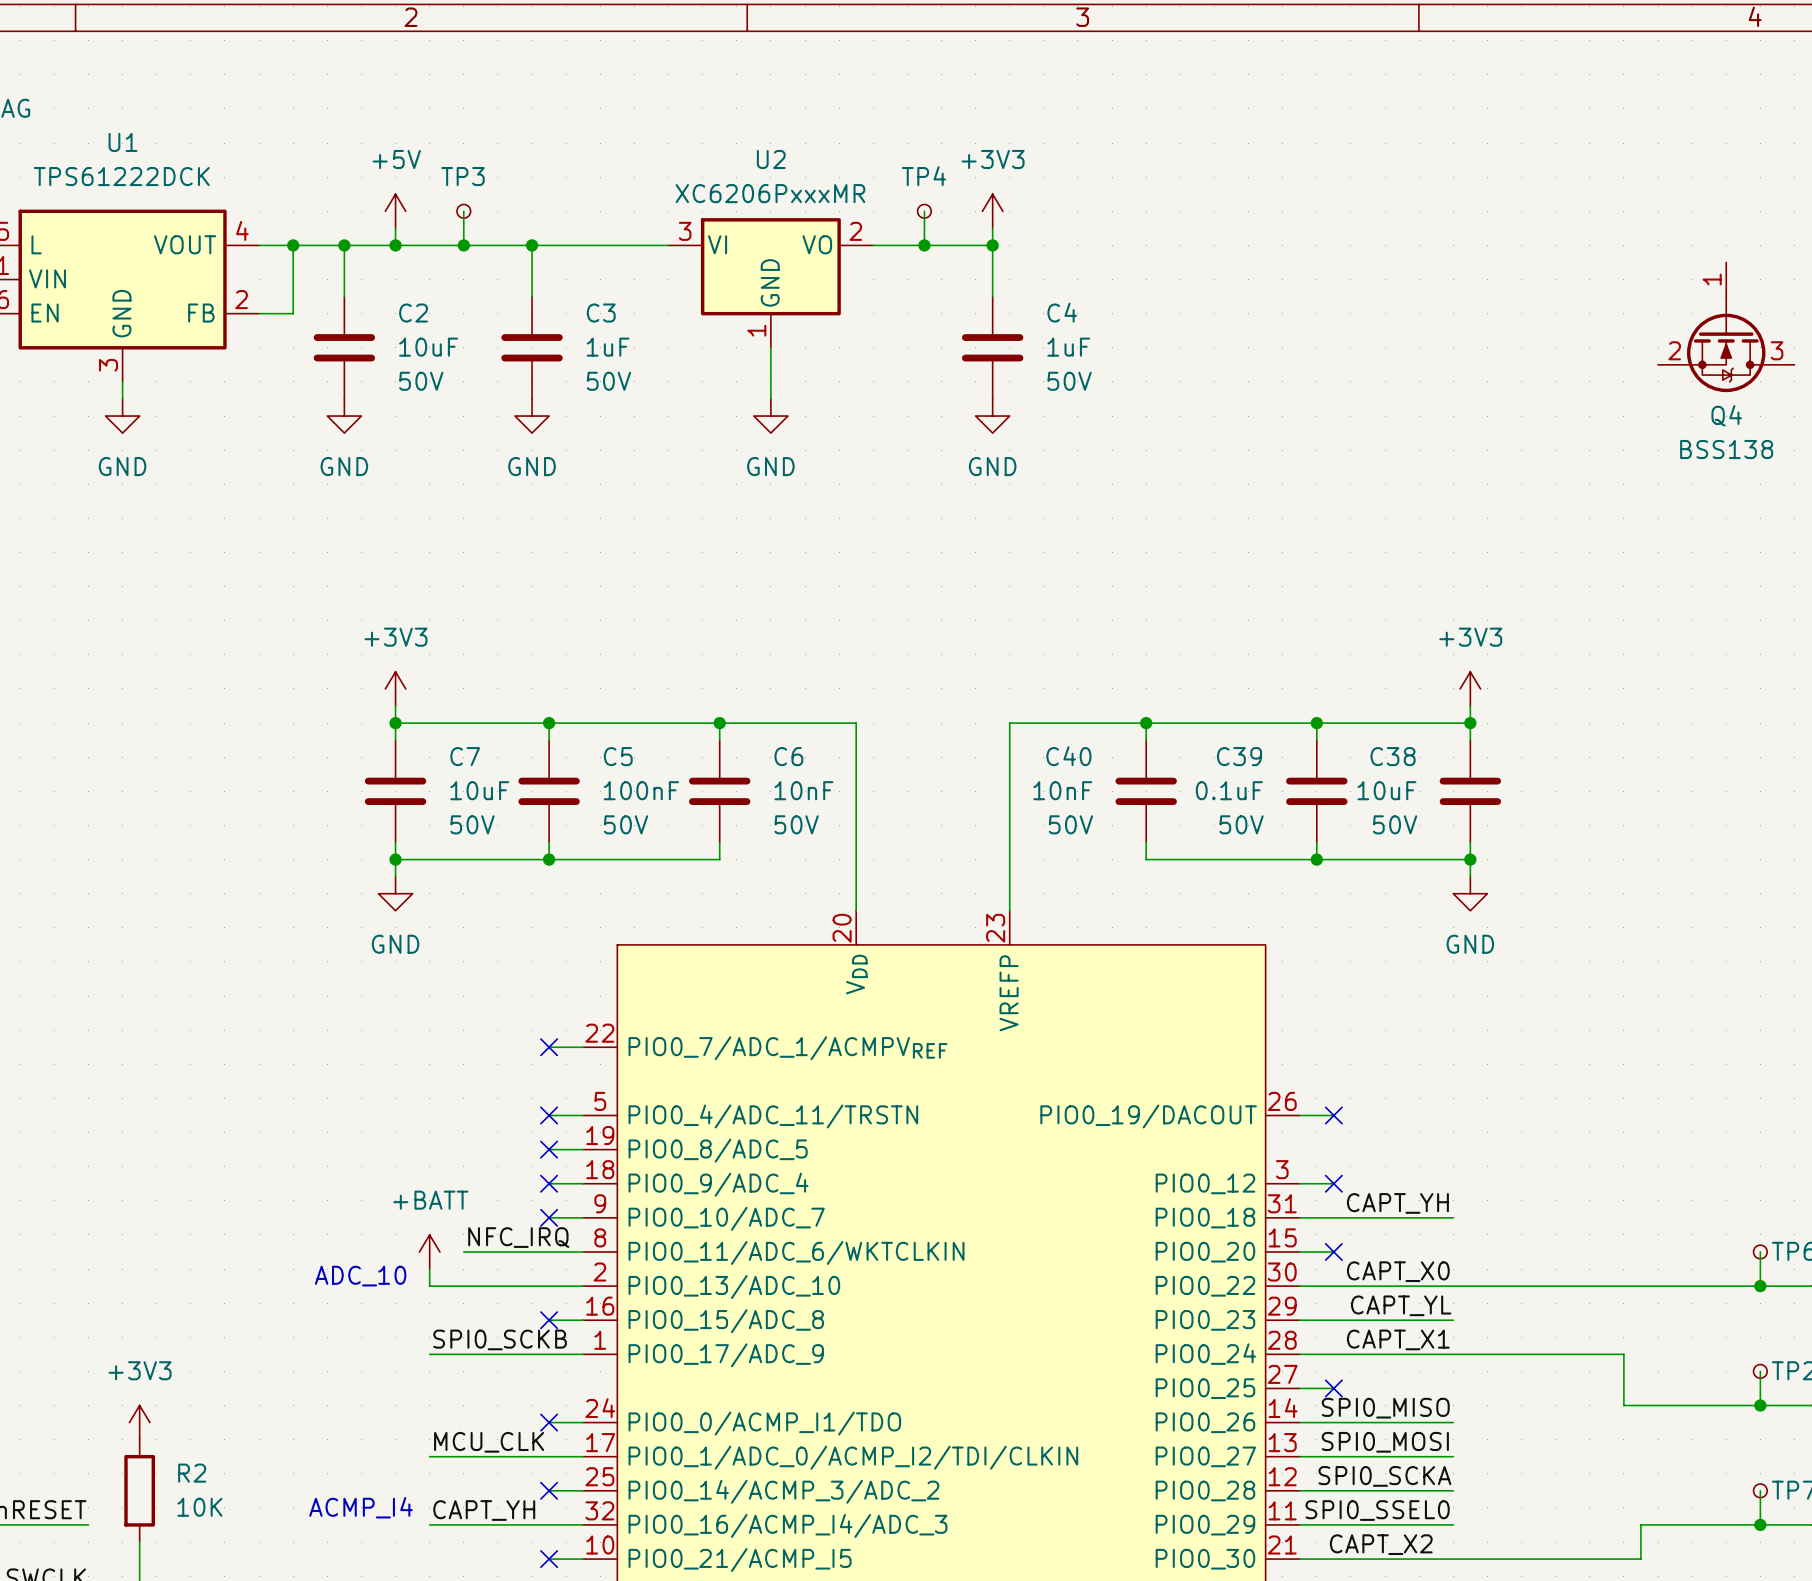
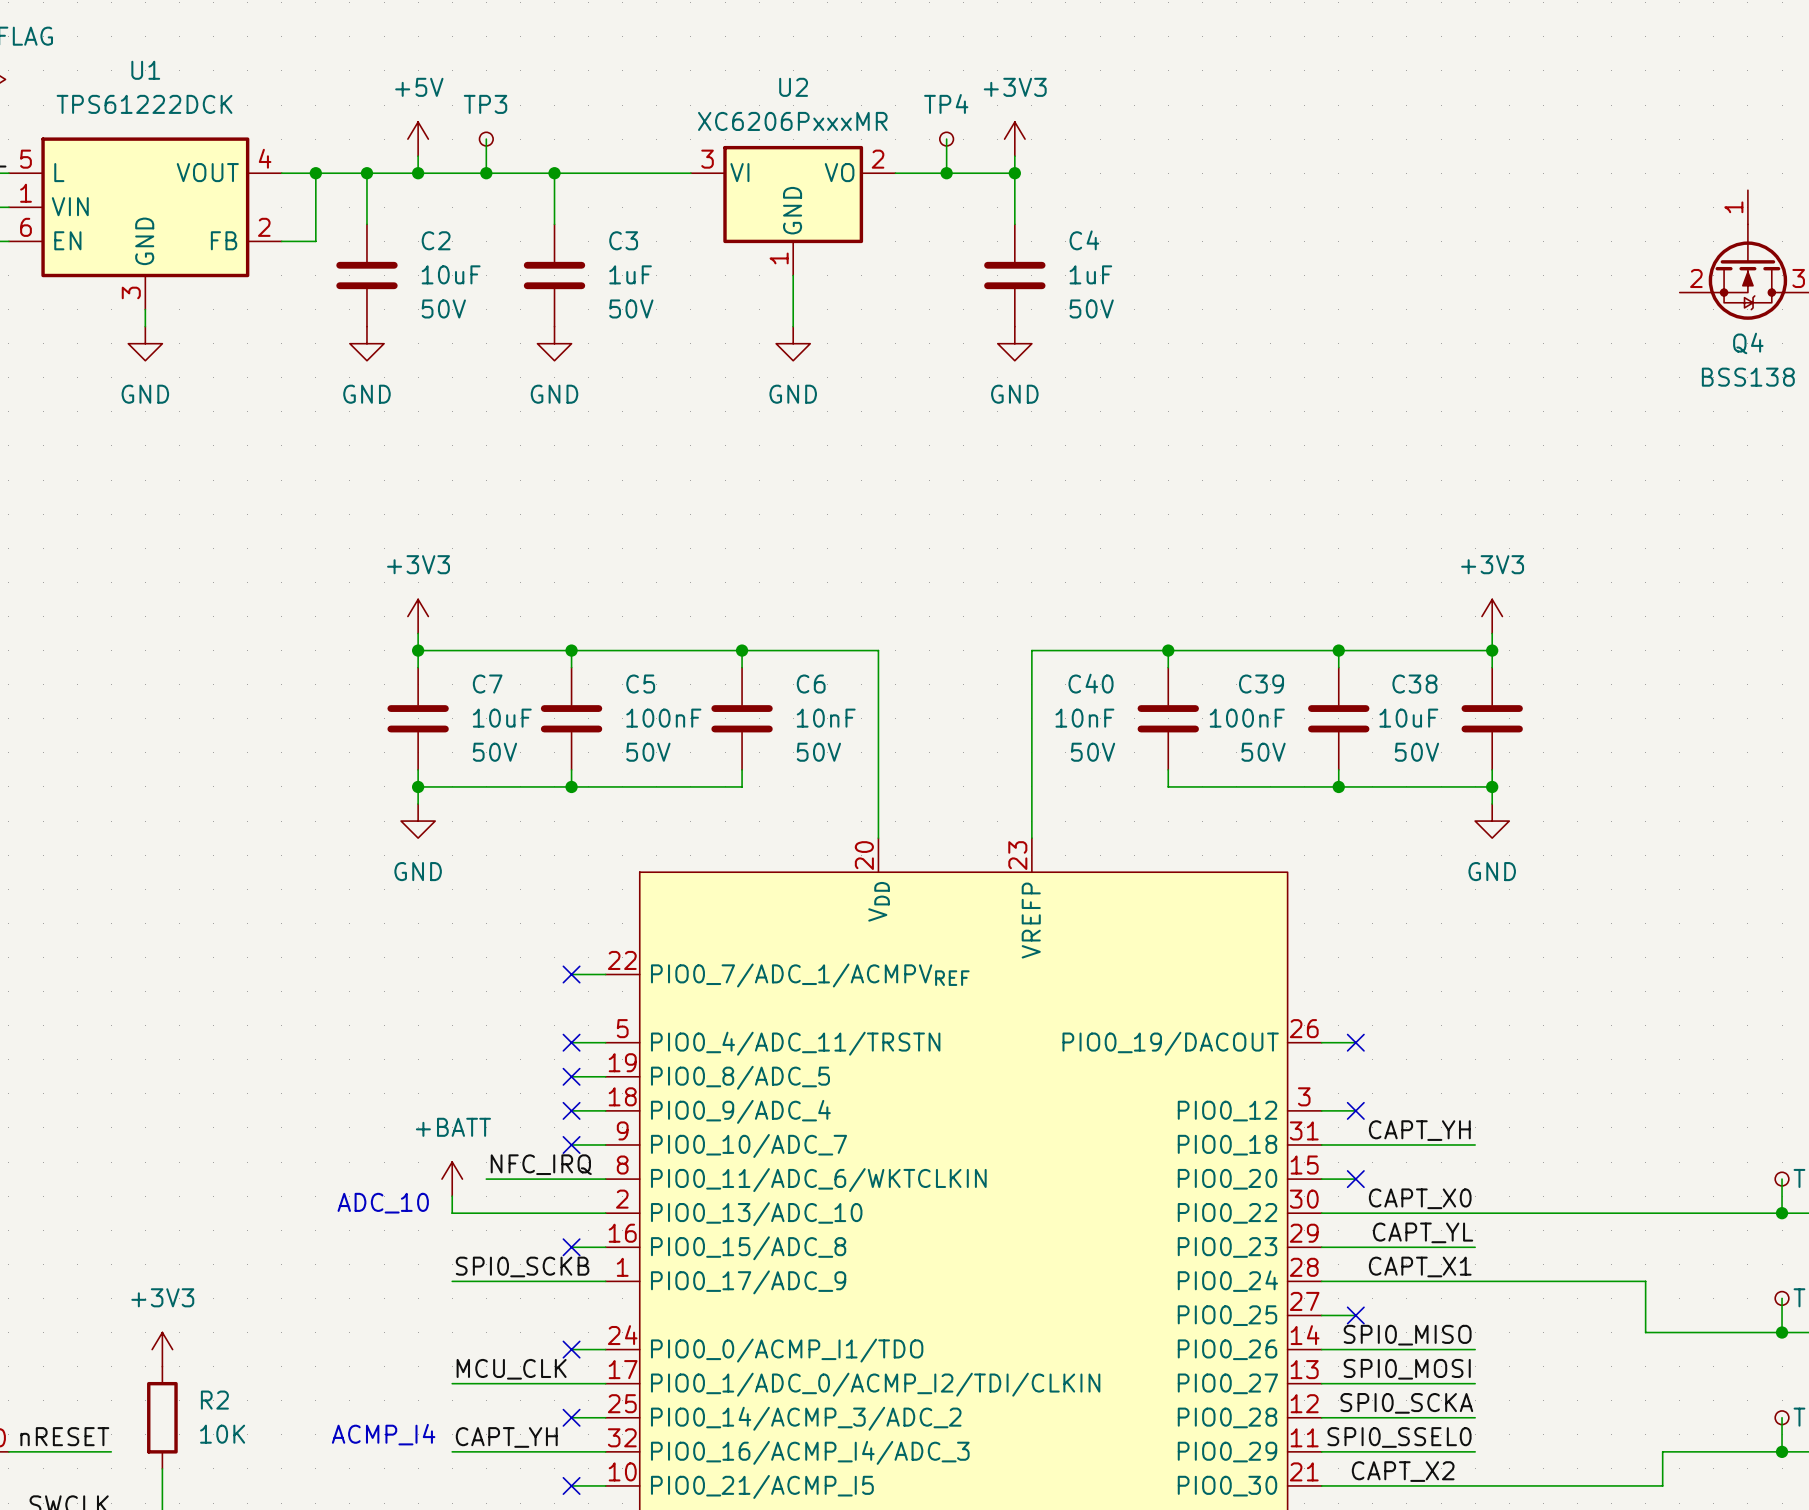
C39 value: 0.1uF (1229, 790) -> 100nF (1247, 718)

